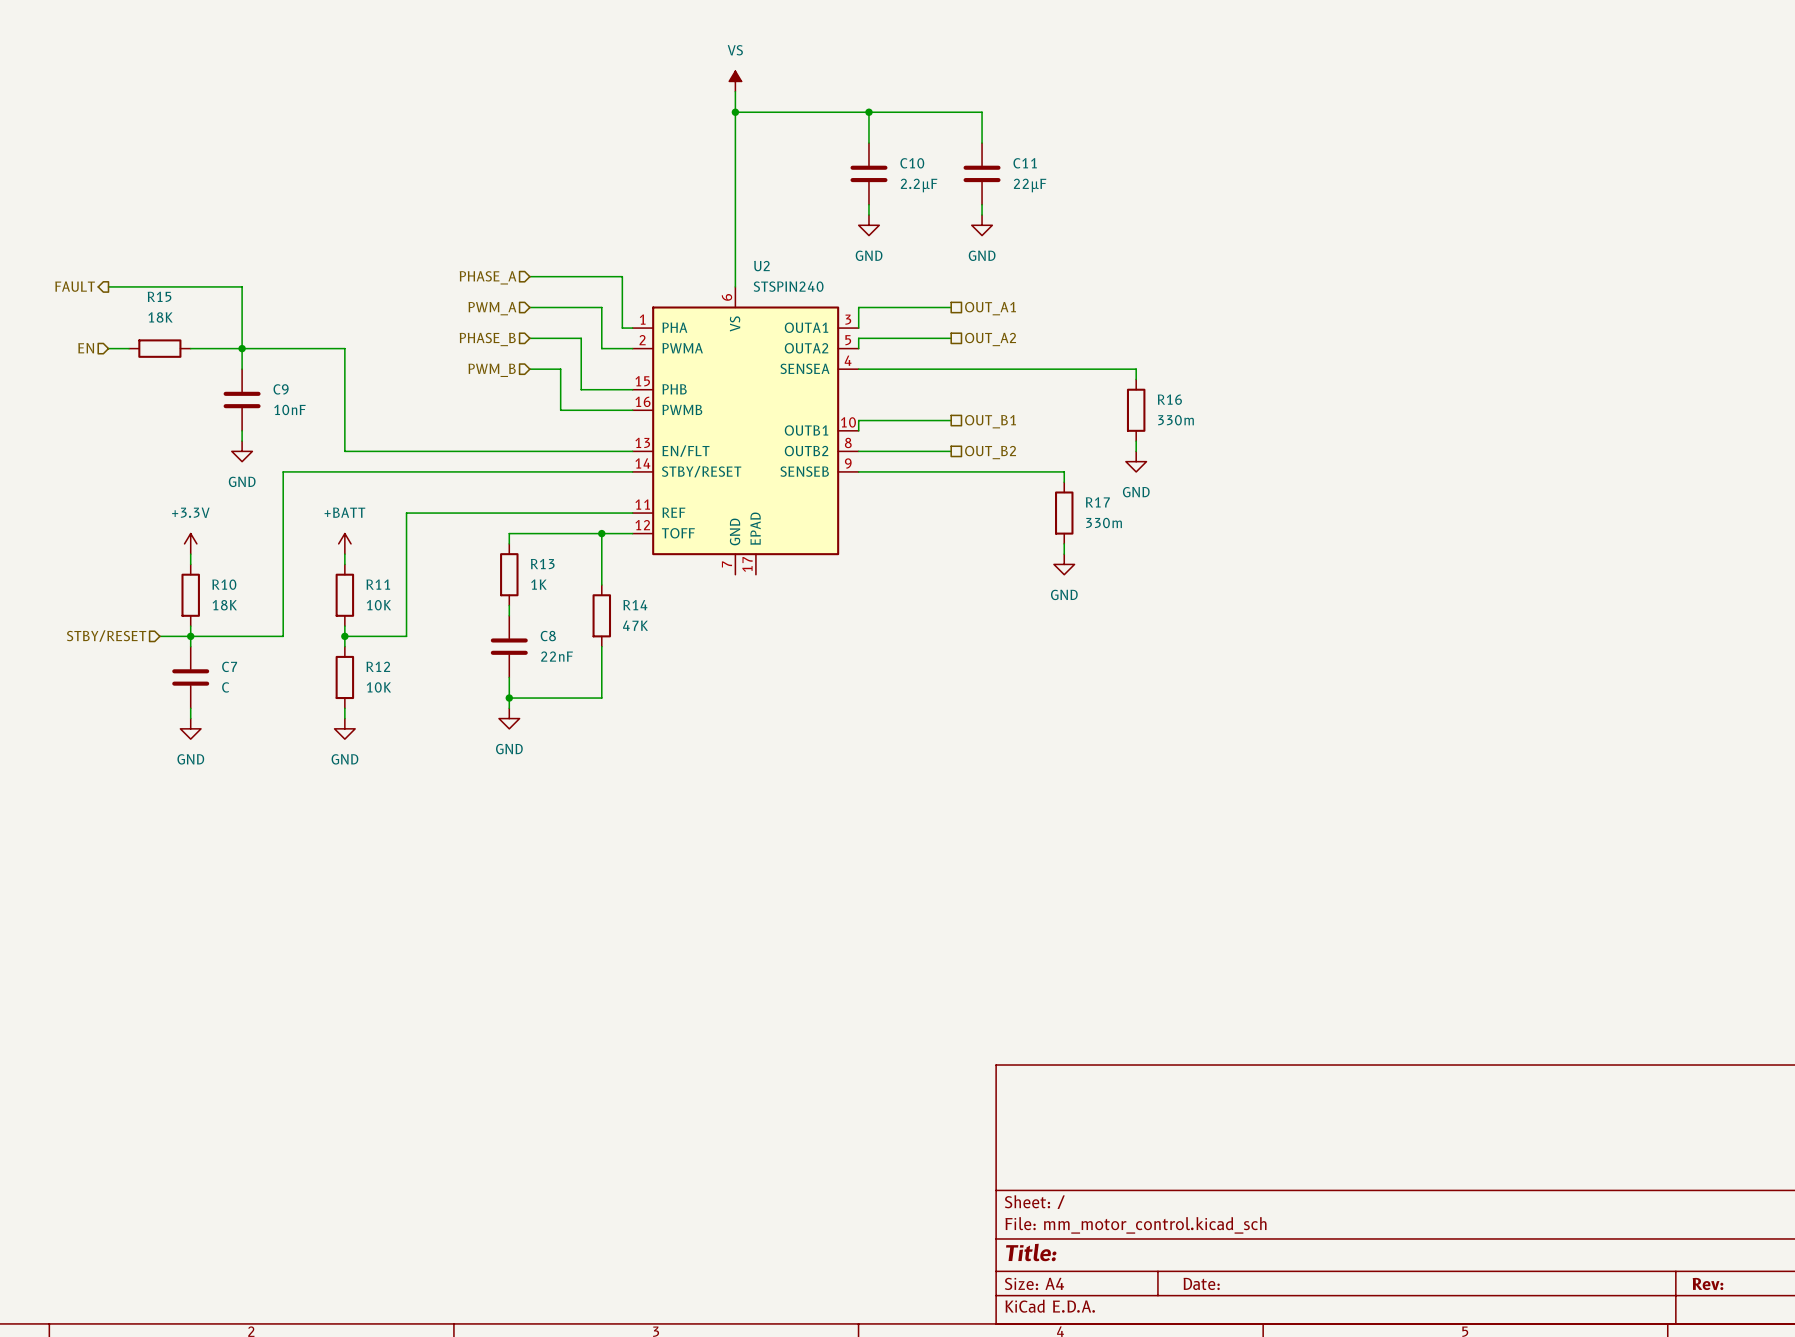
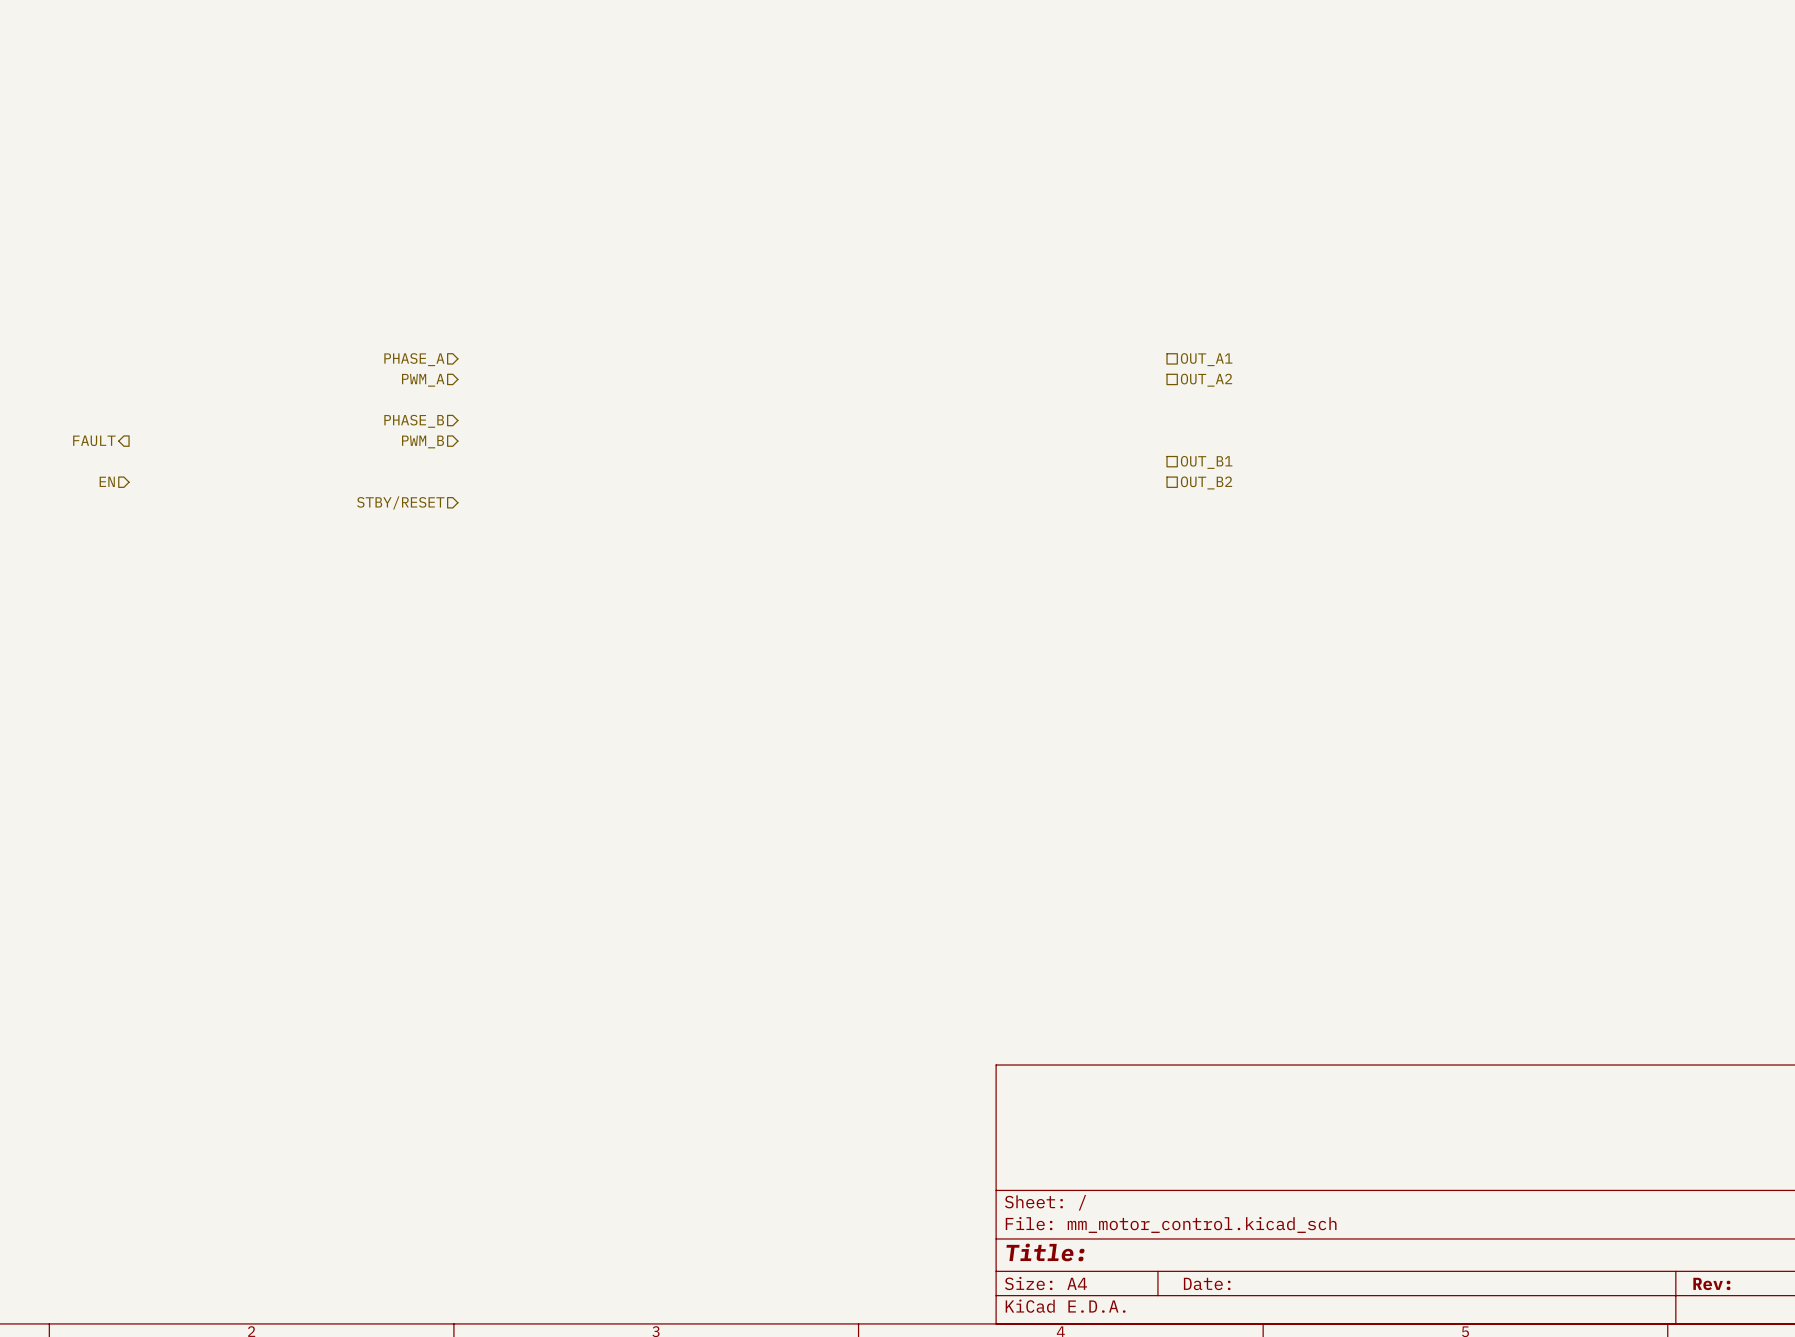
power symbol: VS (735, 81) -> none
wire: (735, 91) (735, 286) -> none
wire: (735, 112) (982, 112) (982, 143) -> none
junction: (735, 112) -> none
wire: (868, 112) (868, 143) -> none
junction: (868, 112) -> none
C10: 2.2µF (868, 173) -> none
C11: 22µF (982, 173) -> none
wire: (868, 204) (868, 215) -> none
wire: (982, 204) (982, 215) -> none
power symbol: GND (868, 225) -> none
power symbol: GND (982, 225) -> none
wire: (529, 276) (622, 276) (622, 328) (632, 328) -> none
hierarchical label position: PHASE_A (488, 277) -> PHASE_A (414, 359)
hierarchical label position: FAULT (75, 286) -> FAULT (94, 440)
wire: (108, 286) (242, 286) (242, 369) -> none
wire: (529, 307) (601, 307) (601, 348) (632, 348) -> none
wire: (951, 307) (858, 307) (858, 328) -> none
hierarchical label position: PWM_A (492, 308) -> PWM_A (423, 380)
hierarchical label: OUT_A1 (990, 308) -> none
wire: (529, 338) (581, 338) (581, 389) (632, 389) -> none
wire: (951, 338) (858, 338) (858, 348) -> none
hierarchical label position: PHASE_B (487, 339) -> PHASE_B (414, 421)
hierarchical label: OUT_A2 (990, 339) -> none
hierarchical label position: EN (86, 348) -> EN (107, 481)
wire: (108, 348) (129, 348) -> none
R15: 18K (159, 348) -> none
wire: (190, 348) (344, 348) (344, 451) (632, 451) -> none
junction: (242, 348) -> none
hierarchical label: none -> OUT_A1 (1206, 359)
wire: (529, 369) (560, 369) (560, 410) (632, 410) -> none
wire: (858, 369) (1136, 369) (1136, 379) -> none
hierarchical label position: PWM_B (492, 370) -> PWM_B (423, 441)
hierarchical label: none -> OUT_A2 (1206, 380)
C9: 10nF (242, 400) -> none
R16: 330m (1136, 410) -> none
wire: (951, 420) (858, 420) (858, 430) -> none
hierarchical label: OUT_B1 (990, 421) -> none
wire: (242, 430) (242, 441) -> none
U2: STSPIN240 (745, 430) -> none
wire: (1136, 441) (1136, 451) -> none
power symbol: GND (242, 451) -> none
wire: (858, 451) (951, 451) -> none
hierarchical label: OUT_B2 (990, 452) -> none
power symbol: GND (1136, 461) -> none
hierarchical label: none -> OUT_B1 (1206, 462)
wire: (632, 471) (283, 471) (283, 636) (159, 636) -> none
wire: (858, 471) (1064, 471) (1064, 482) -> none
hierarchical label: none -> OUT_B2 (1206, 482)
hierarchical label: none -> STBY/RESET (400, 502)
wire: (632, 513) (406, 513) (406, 636) (344, 636) -> none
R17: 330m (1064, 513) -> none
wire: (601, 533) (601, 584) -> none
junction: (601, 533) -> none
wire: (632, 533) (509, 533) (509, 543) -> none
power symbol: +3.3V (190, 543) -> none
power symbol: +BATT (344, 543) -> none
wire: (1064, 543) (1064, 554) -> none
wire: (190, 554) (190, 564) -> none
wire: (344, 554) (344, 564) -> none
power symbol: GND (1064, 564) -> none
R13: 1K (509, 574) -> none
R10: 18K (190, 595) -> none
R11: 10K (344, 595) -> none
wire: (509, 605) (509, 615) -> none
R14: 47K (601, 615) -> none
wire: (190, 626) (190, 646) -> none
wire: (344, 626) (344, 646) -> none
hierarchical label: STBY/RESET (106, 636) -> none
junction: (190, 636) -> none
junction: (344, 636) -> none
C8: 22nF (509, 646) -> none
wire: (601, 646) (601, 698) (509, 698) -> none
C7: C (190, 677) -> none
R12: 10K (344, 677) -> none
wire: (509, 677) (509, 708) -> none
junction: (509, 698) -> none
wire: (190, 708) (190, 718) -> none
wire: (344, 708) (344, 718) -> none
power symbol: GND (509, 718) -> none
power symbol: GND (190, 728) -> none
power symbol: GND (344, 728) -> none

